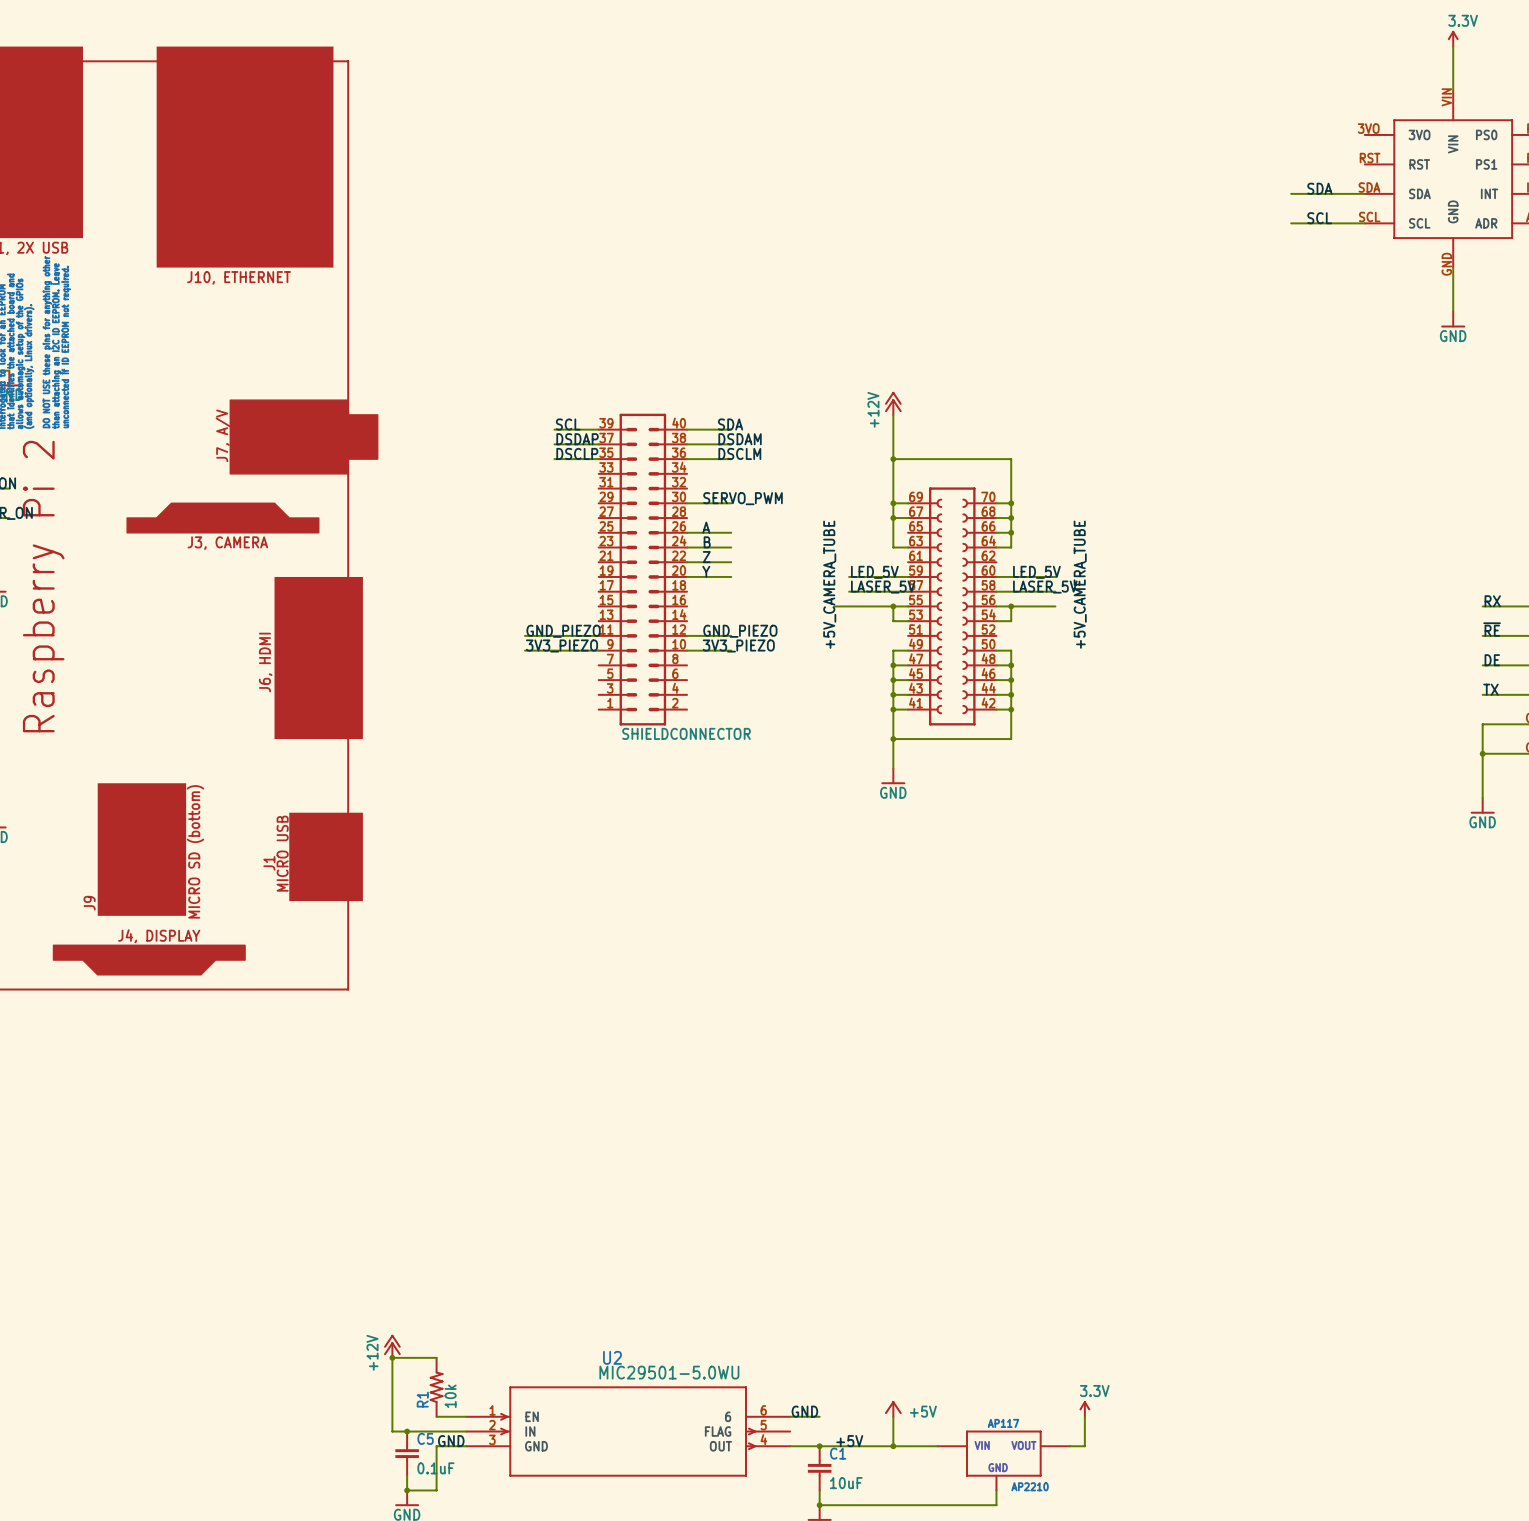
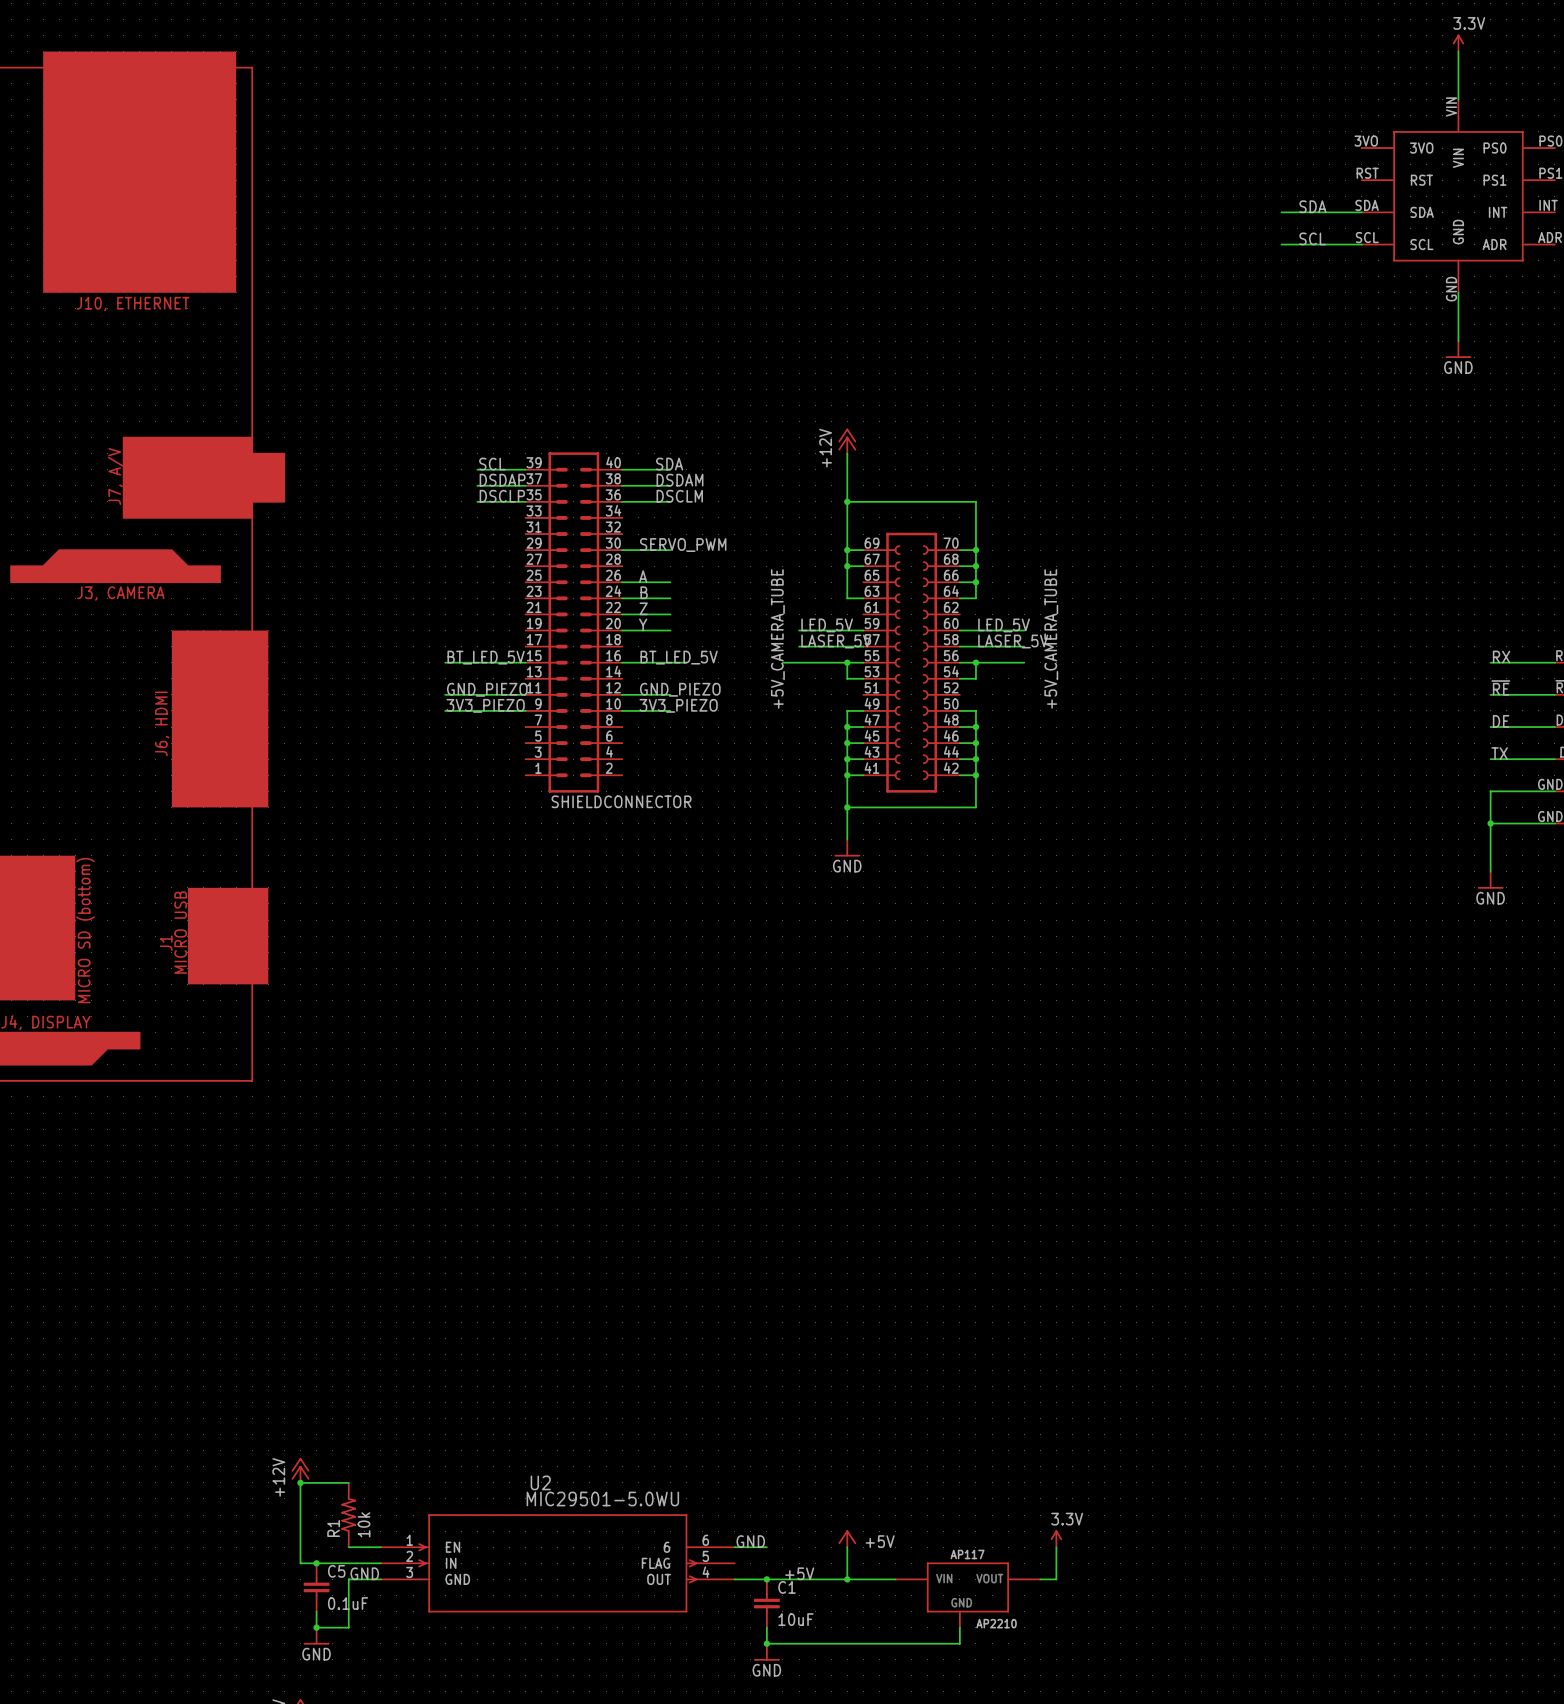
label: none -> BT_LED_5V (486, 657)
label: none -> BT_LED_5V (679, 657)
wire: none -> (445, 662) (525, 662)
wire: none -> (622, 662) (686, 662)

